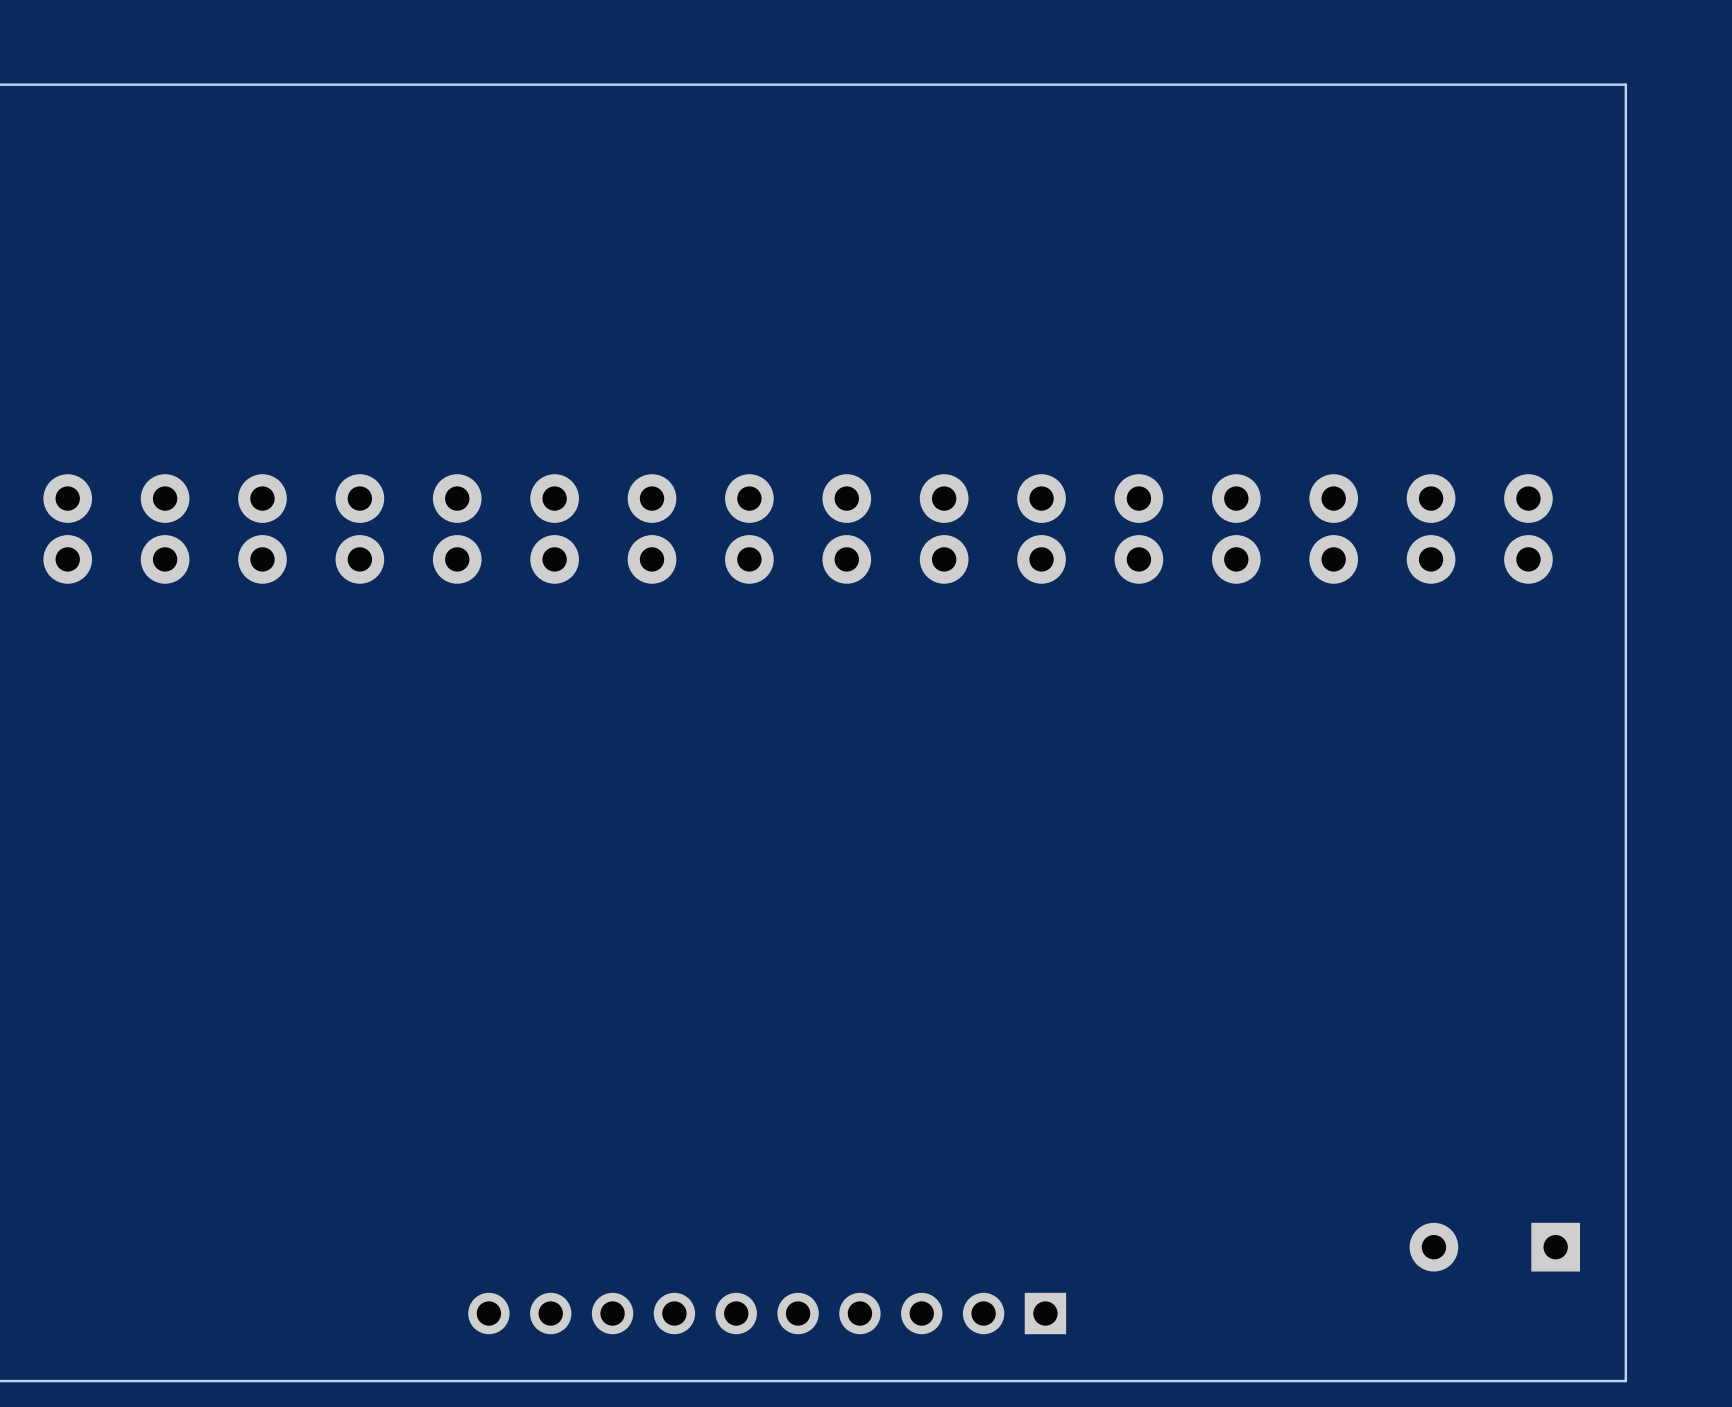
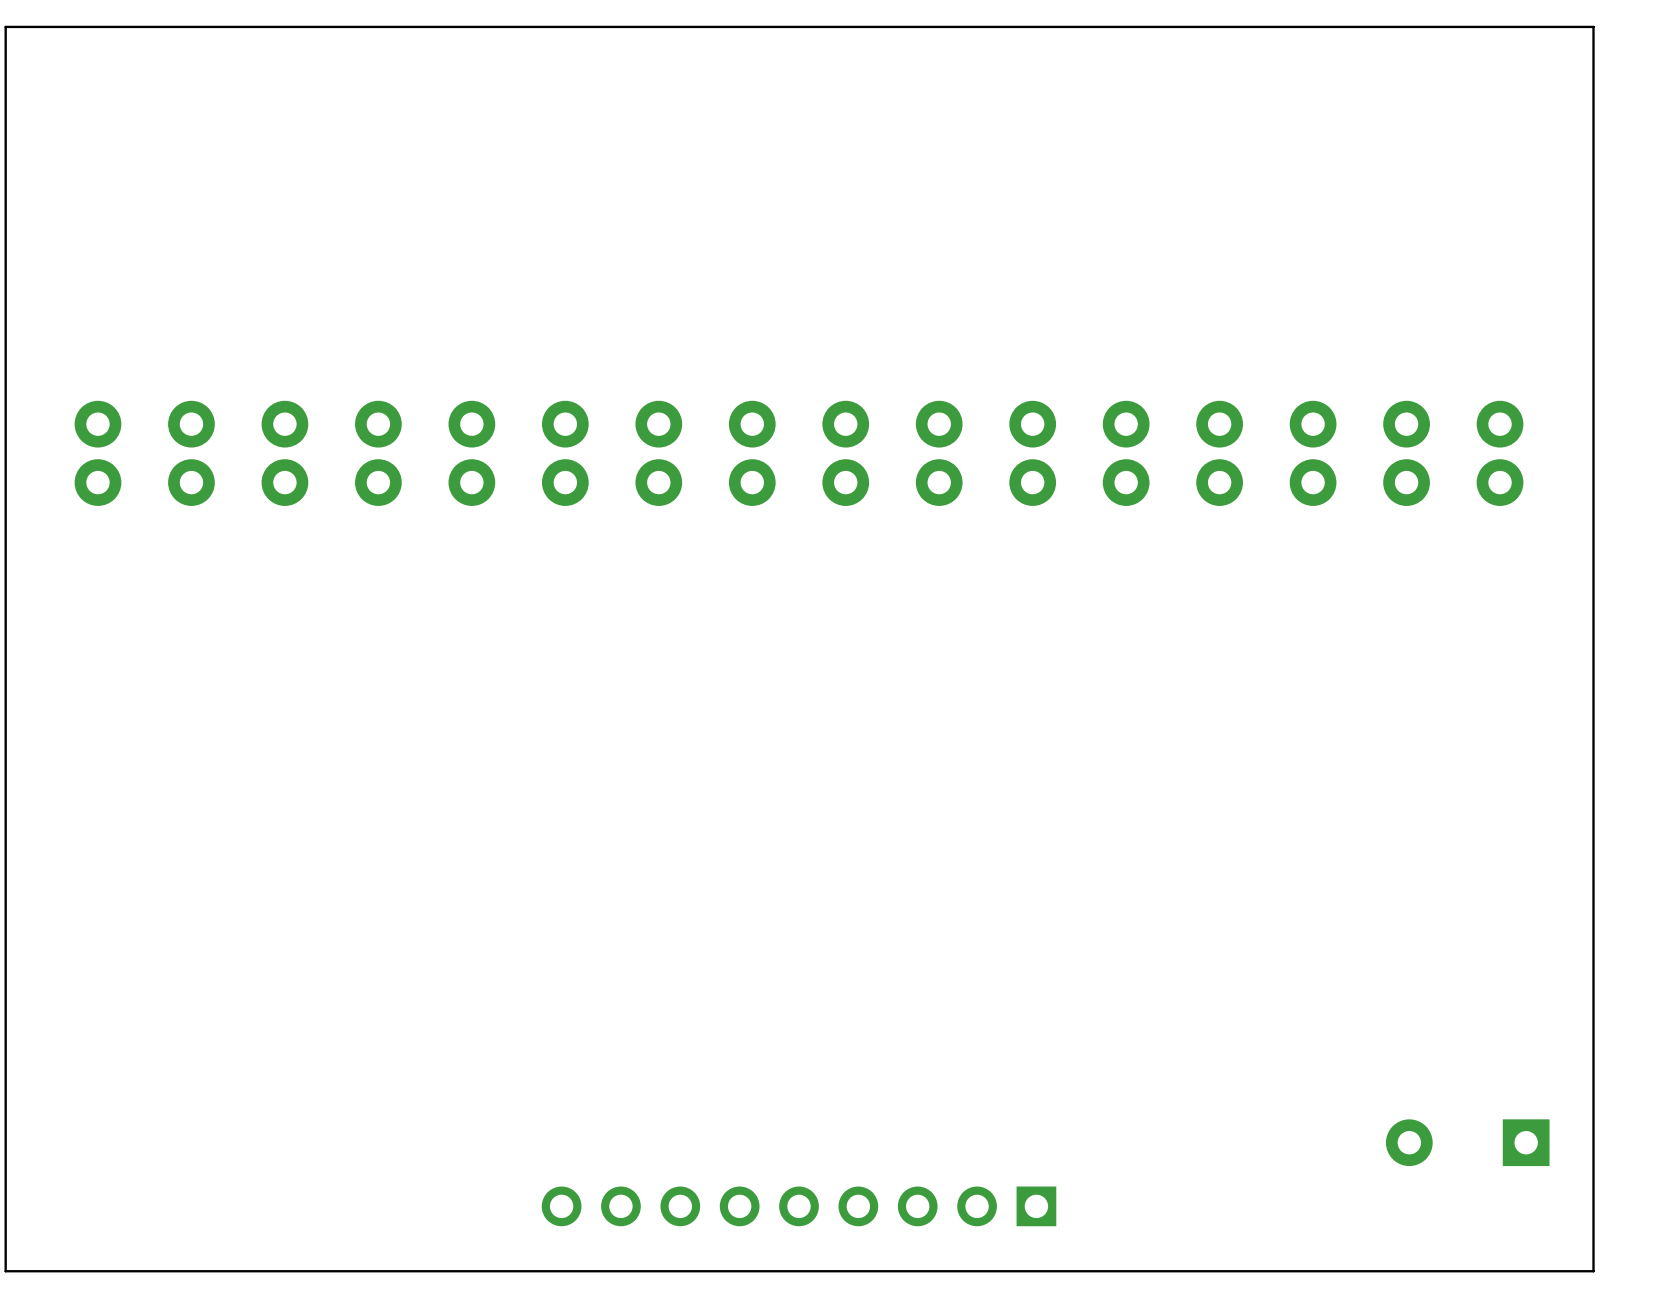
part: (767, 1313) -> none

